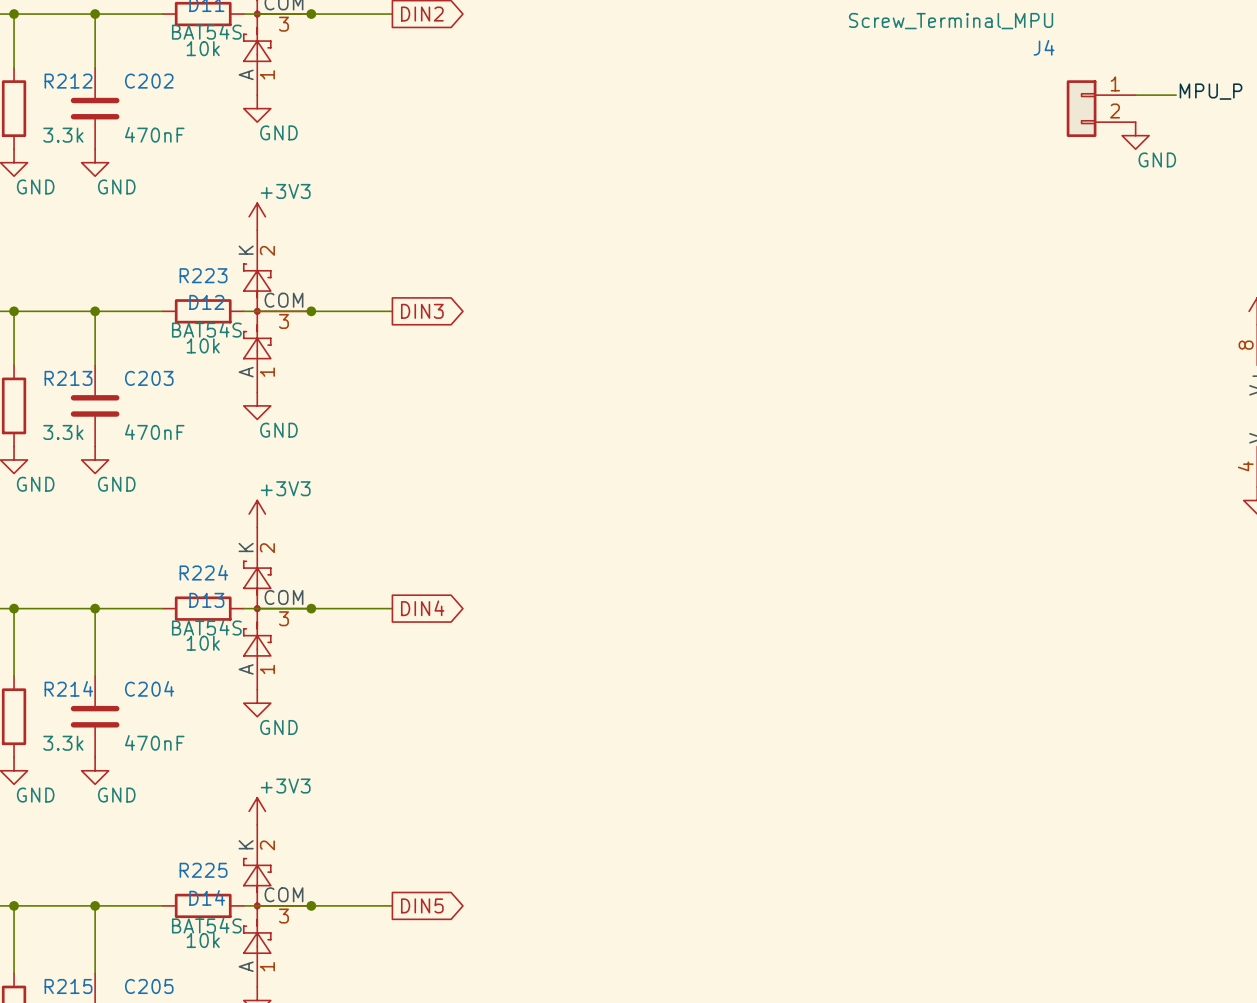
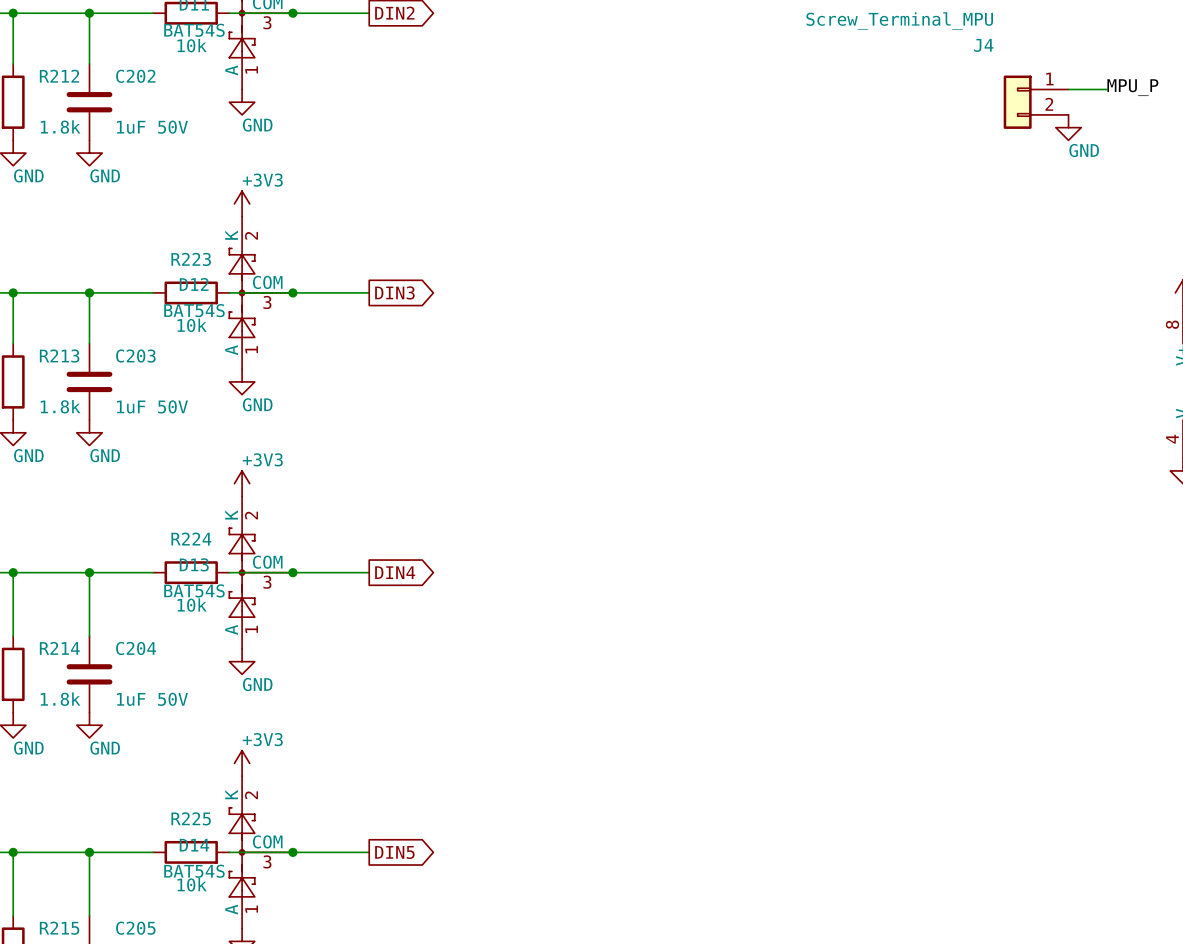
C202 value: 470nF (154, 134) -> 1uF 50V (152, 127)
R212 value: 3.3k (63, 135) -> 1.8k (60, 127)
R213 value: 3.3k (63, 432) -> 1.8k (60, 406)
C203 value: 470nF (154, 432) -> 1uF 50V (152, 406)
C204 value: 470nF (154, 742) -> 1uF 50V (152, 699)
R214 value: 3.3k (63, 743) -> 1.8k (60, 699)

